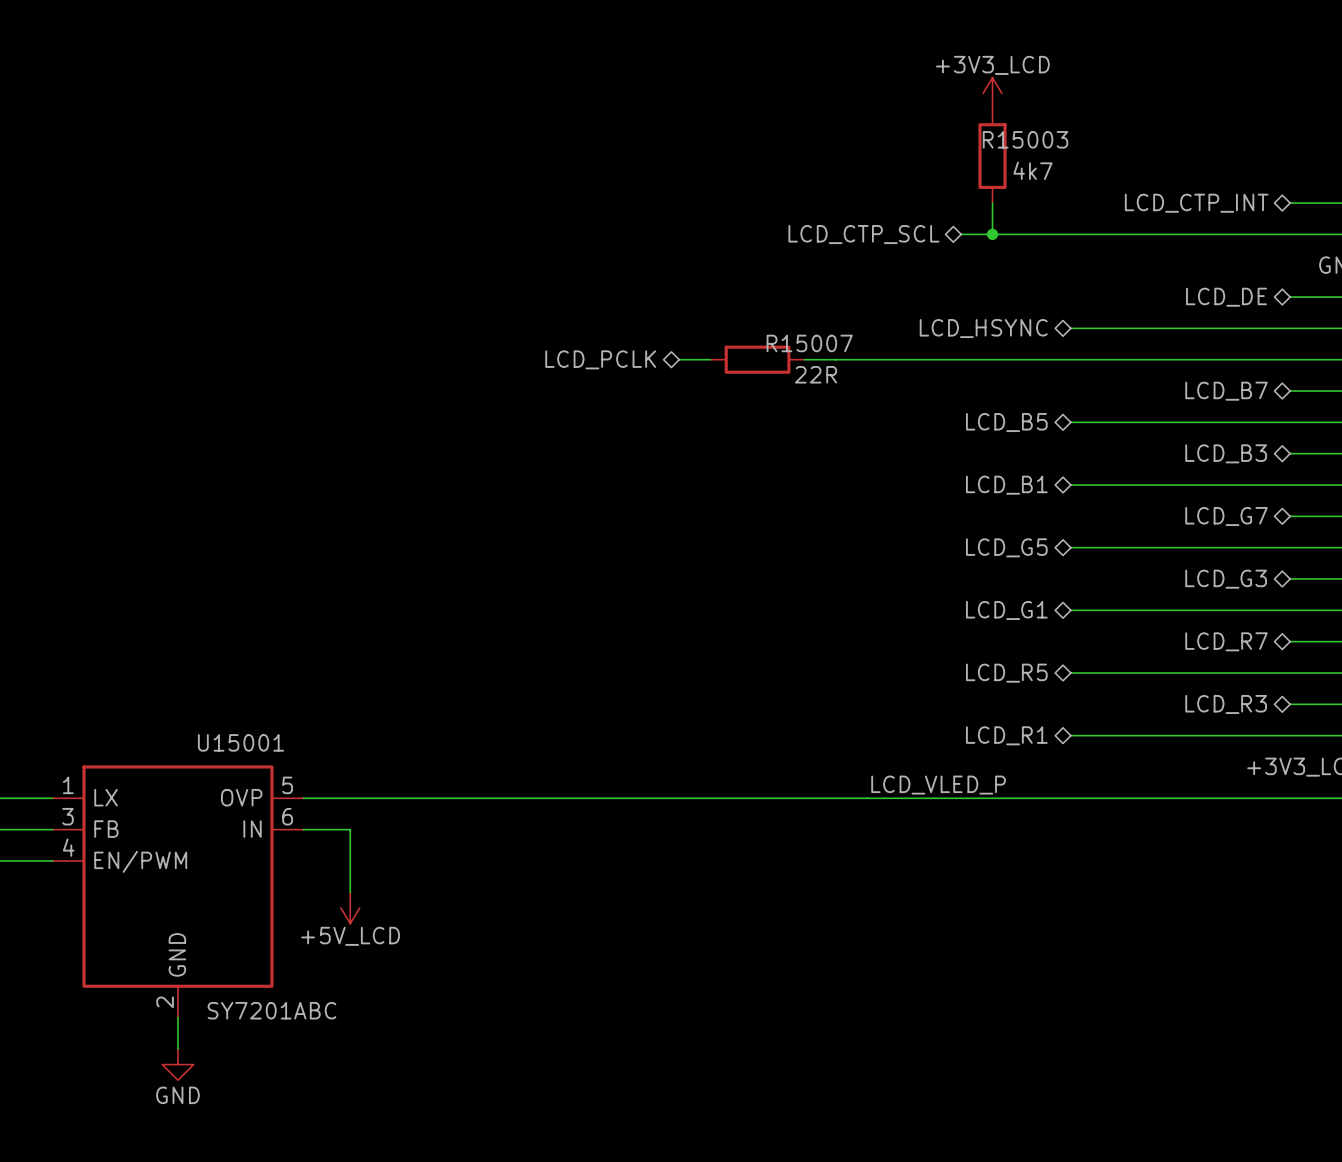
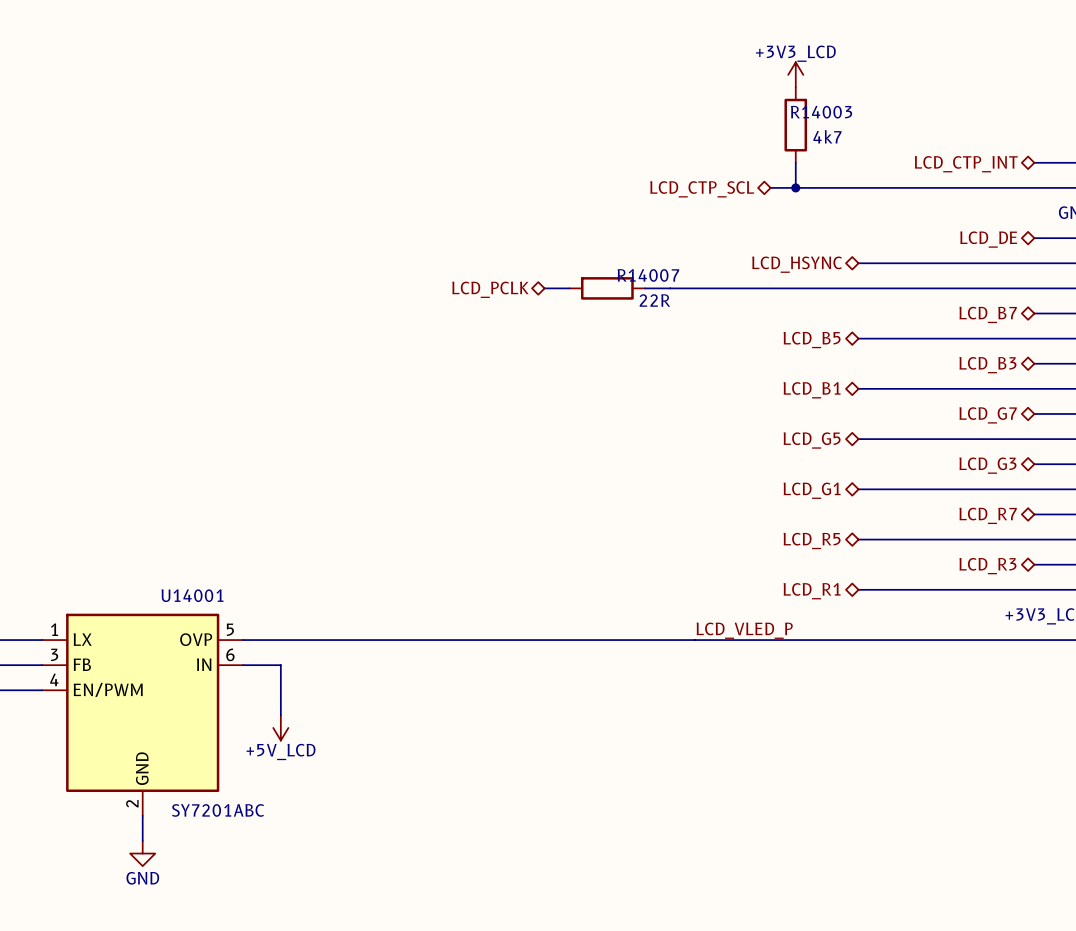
R15003 name: R15003 (1025, 139) -> R14003 (821, 112)
R15007 name: R15007 (809, 343) -> R14007 (648, 275)
U15001 name: U15001 (241, 742) -> U14001 (192, 595)

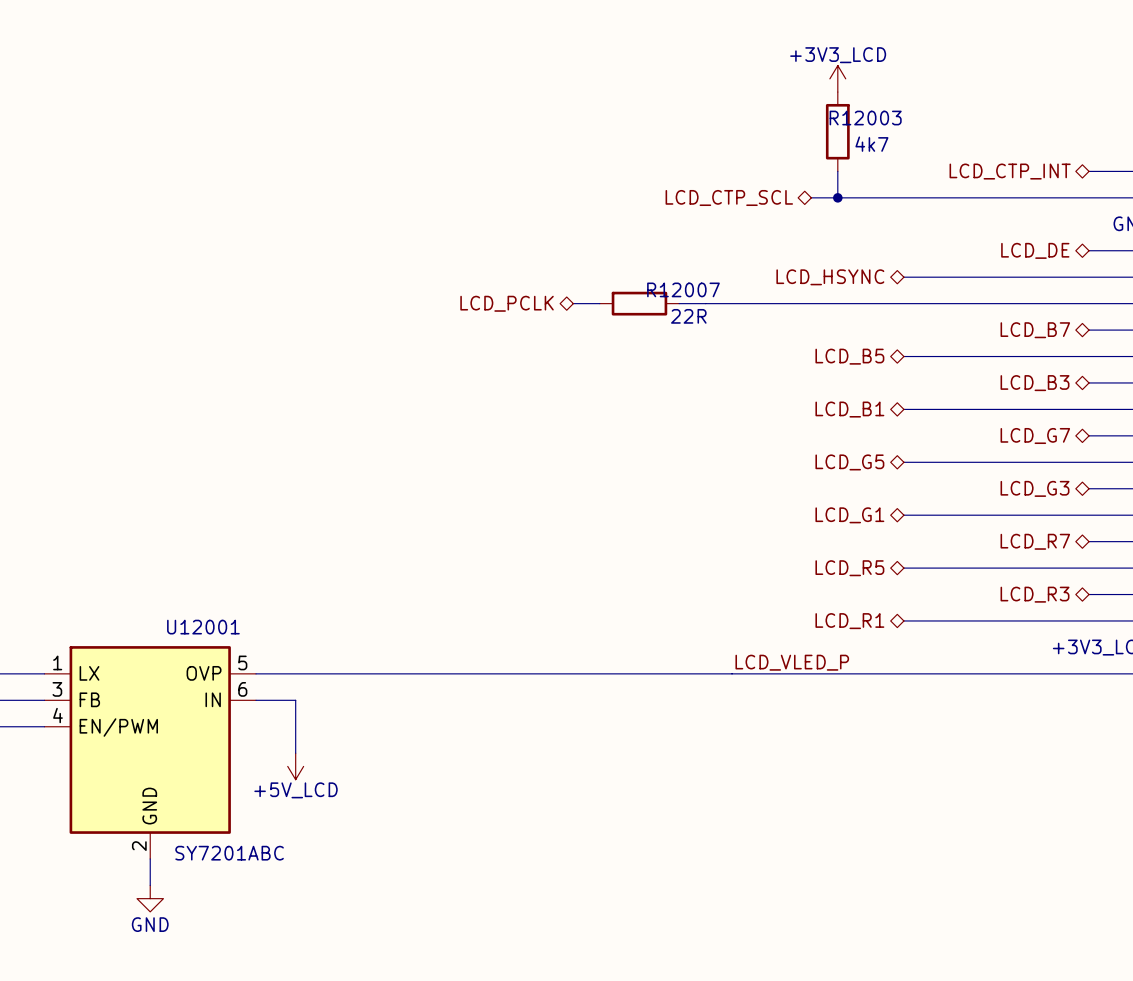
R14003 name: R14003 (821, 112) -> R12003 (865, 118)
R14007 name: R14007 (648, 275) -> R12007 (683, 289)
U14001 name: U14001 (192, 595) -> U12001 (203, 627)

